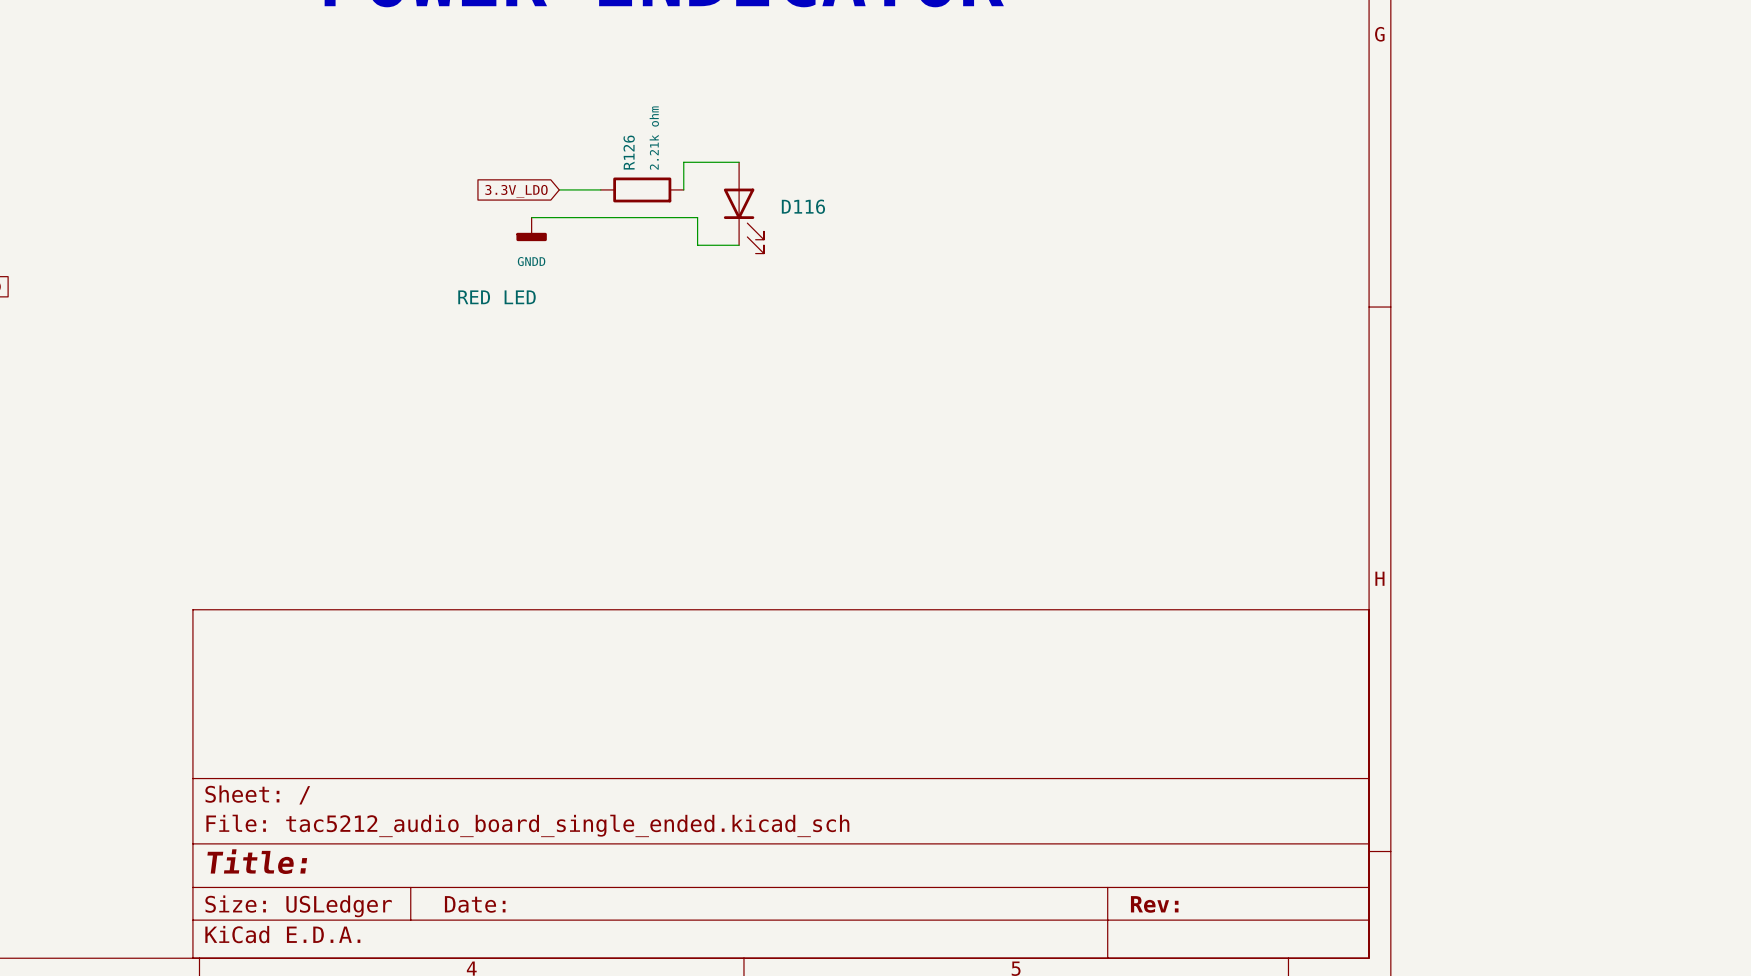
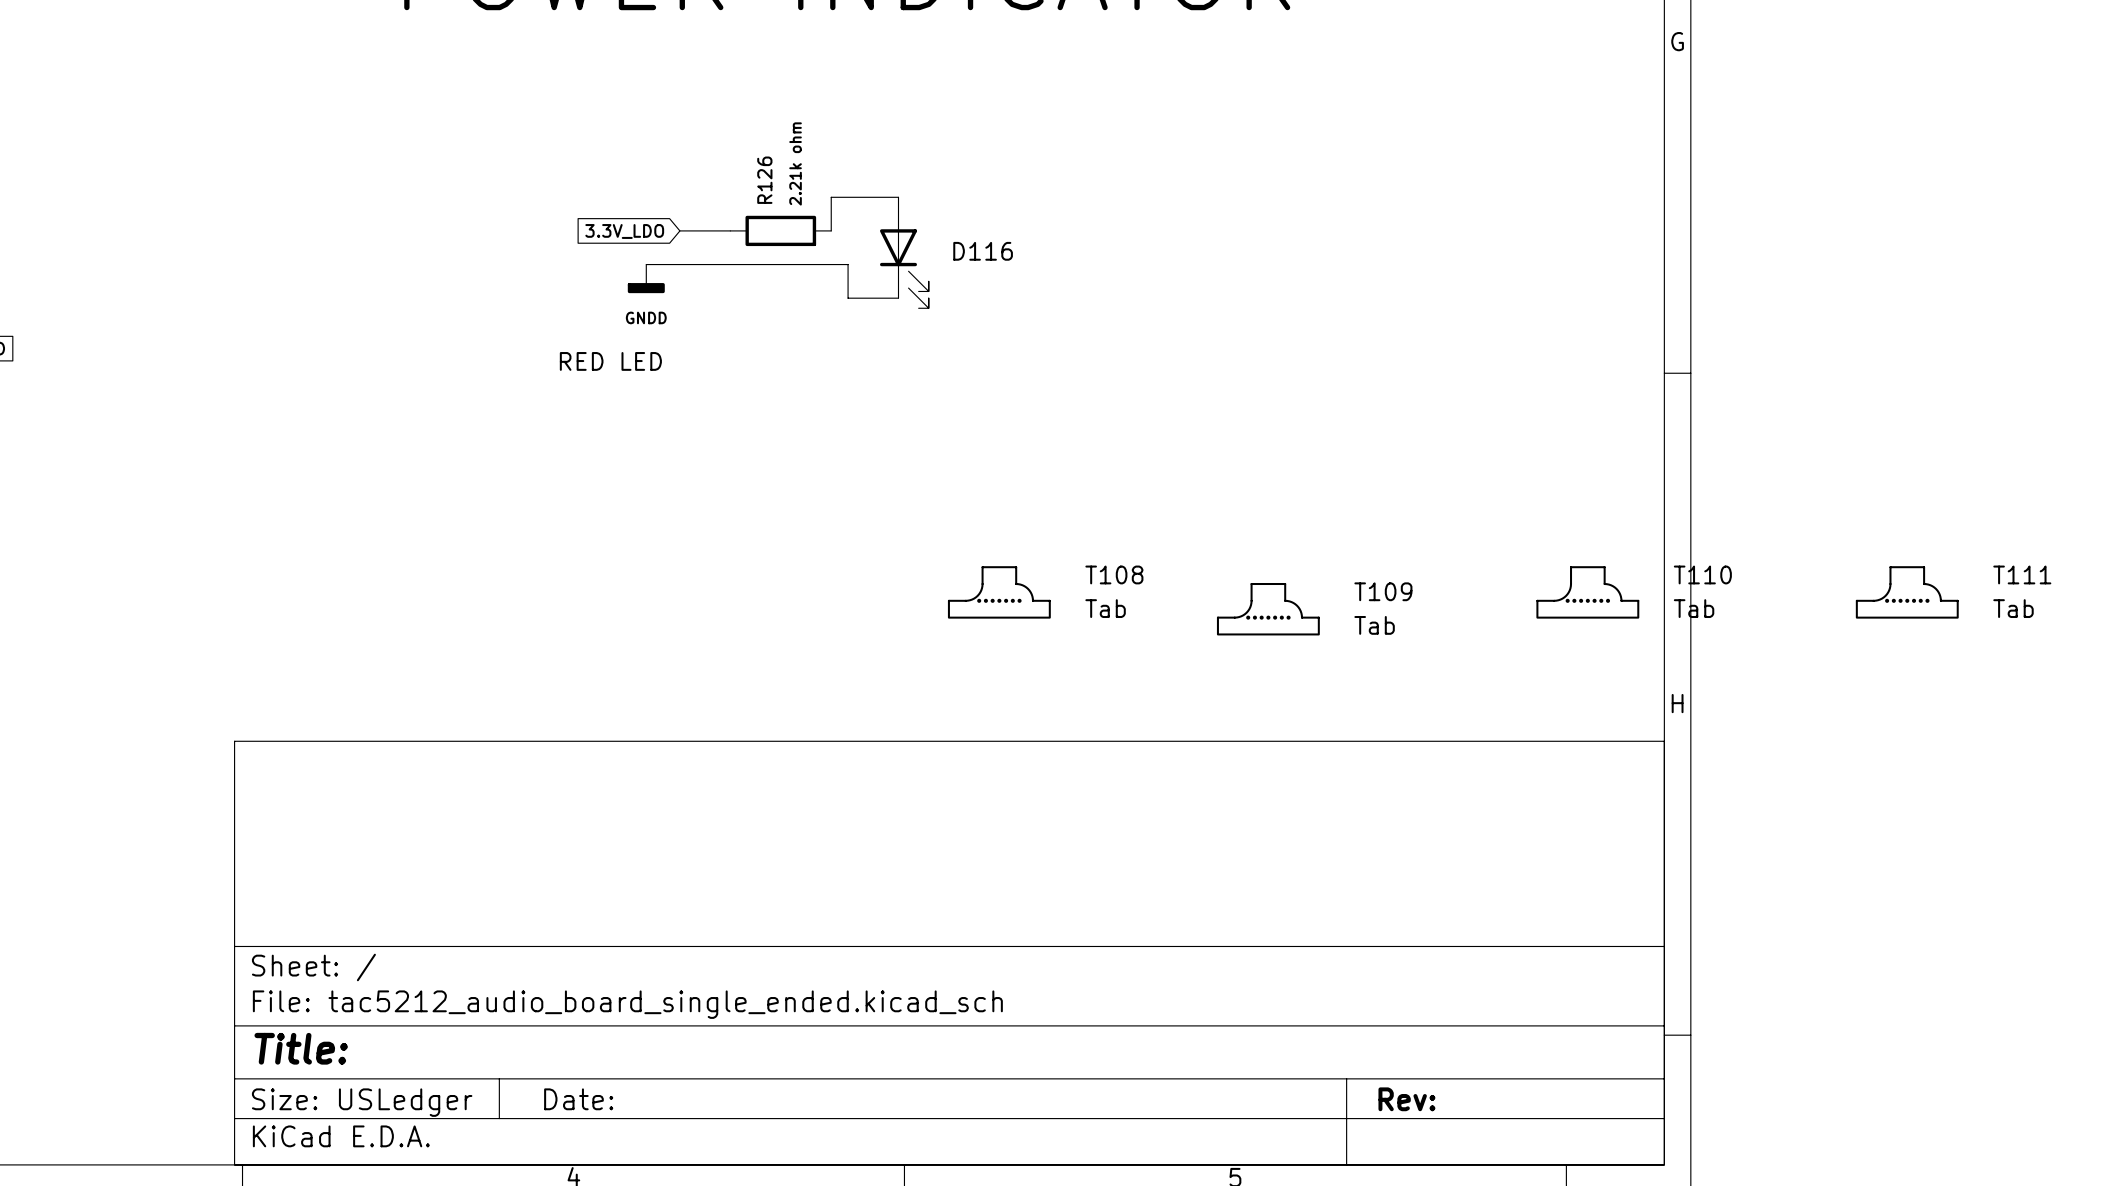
T108: none -> Tab (999, 592)
T110: none -> Tab (1587, 592)
T111: none -> Tab (1907, 592)
T109: none -> Tab (1268, 609)

